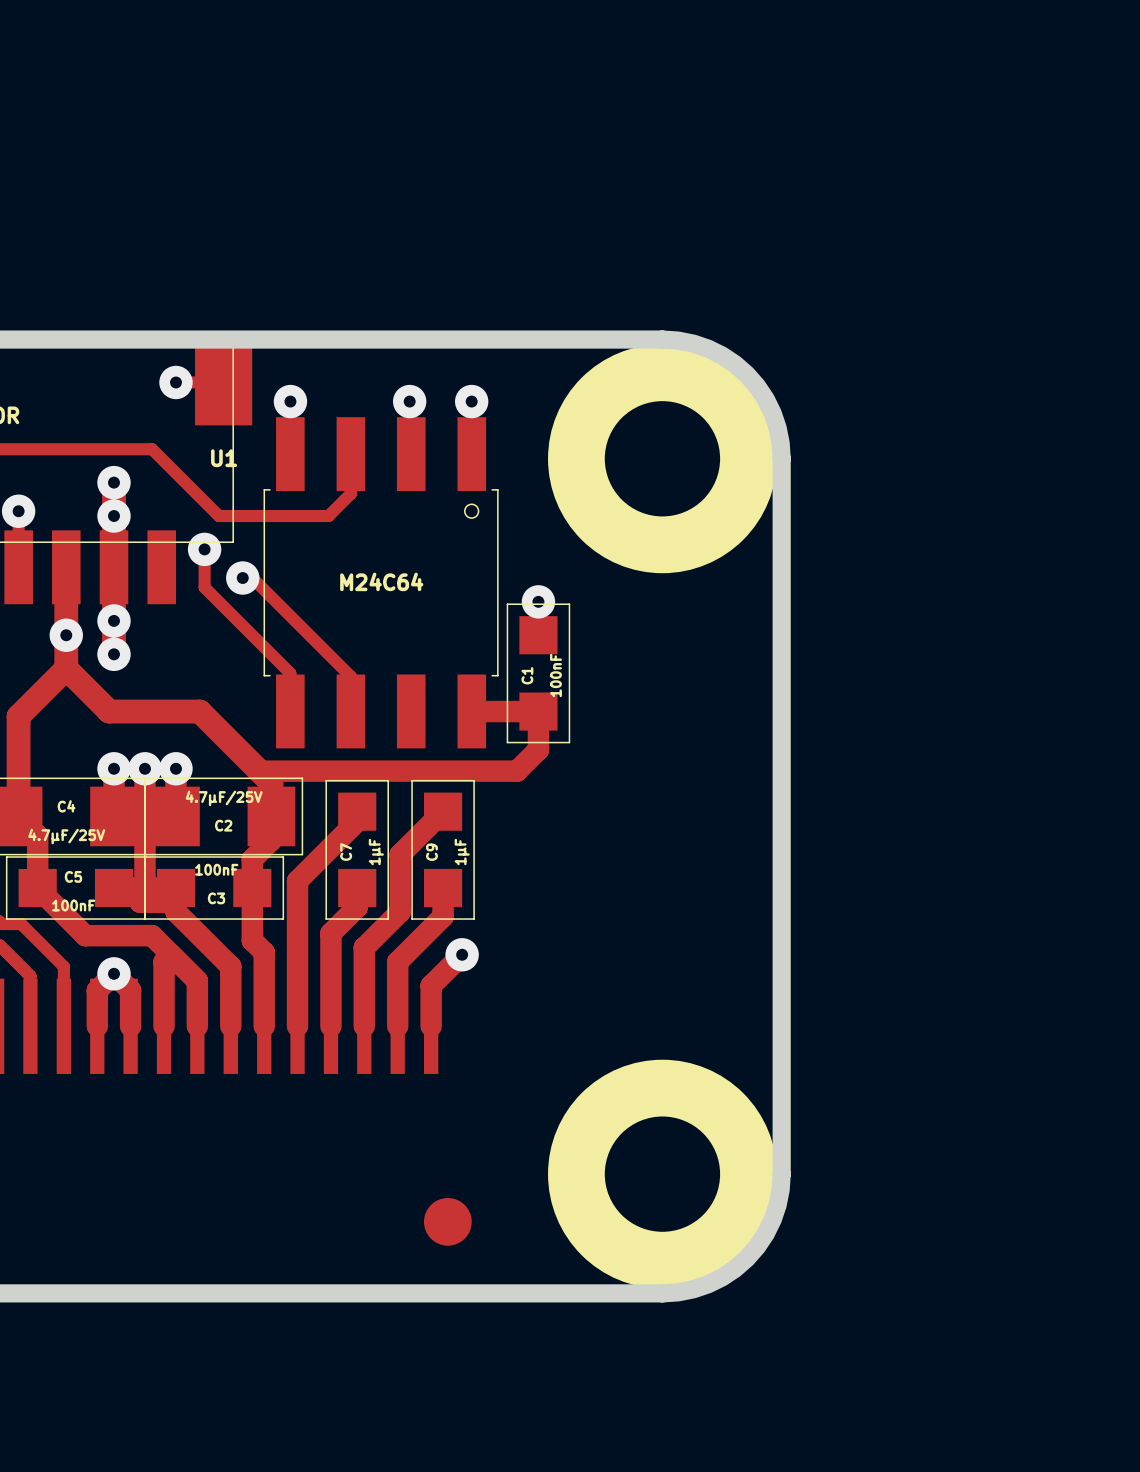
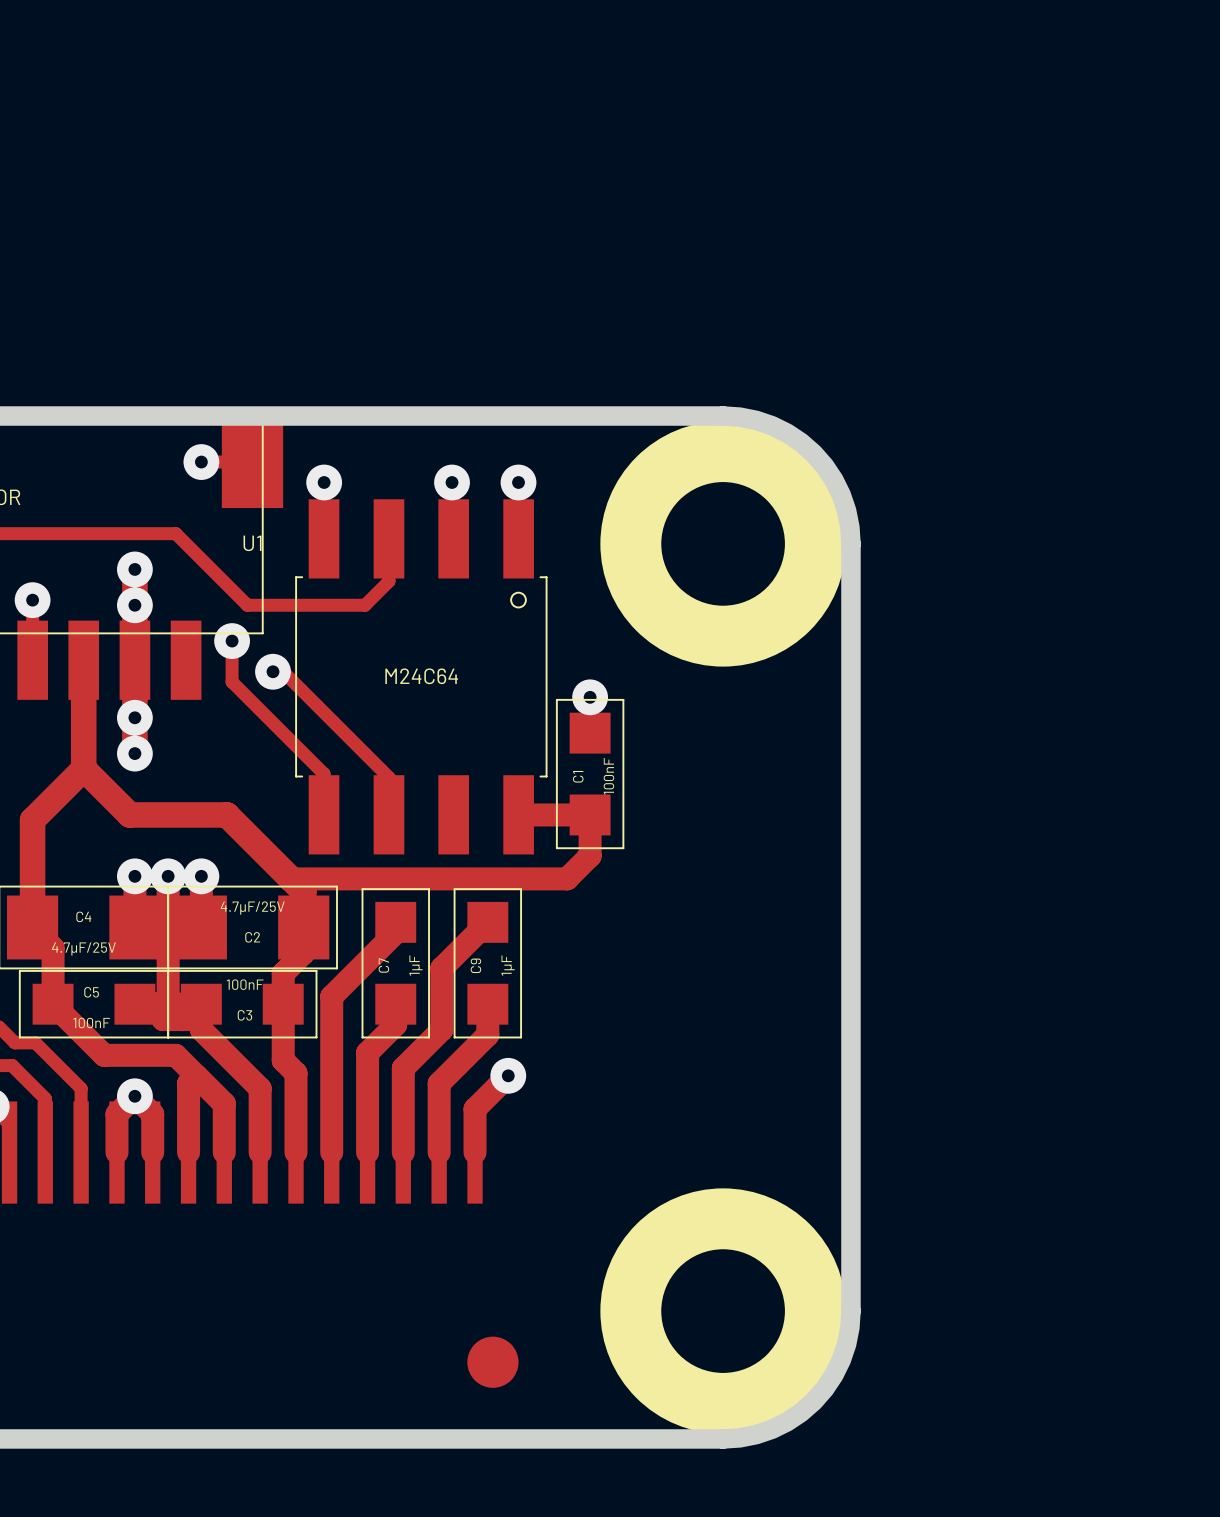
via: (66, 635) -> none

